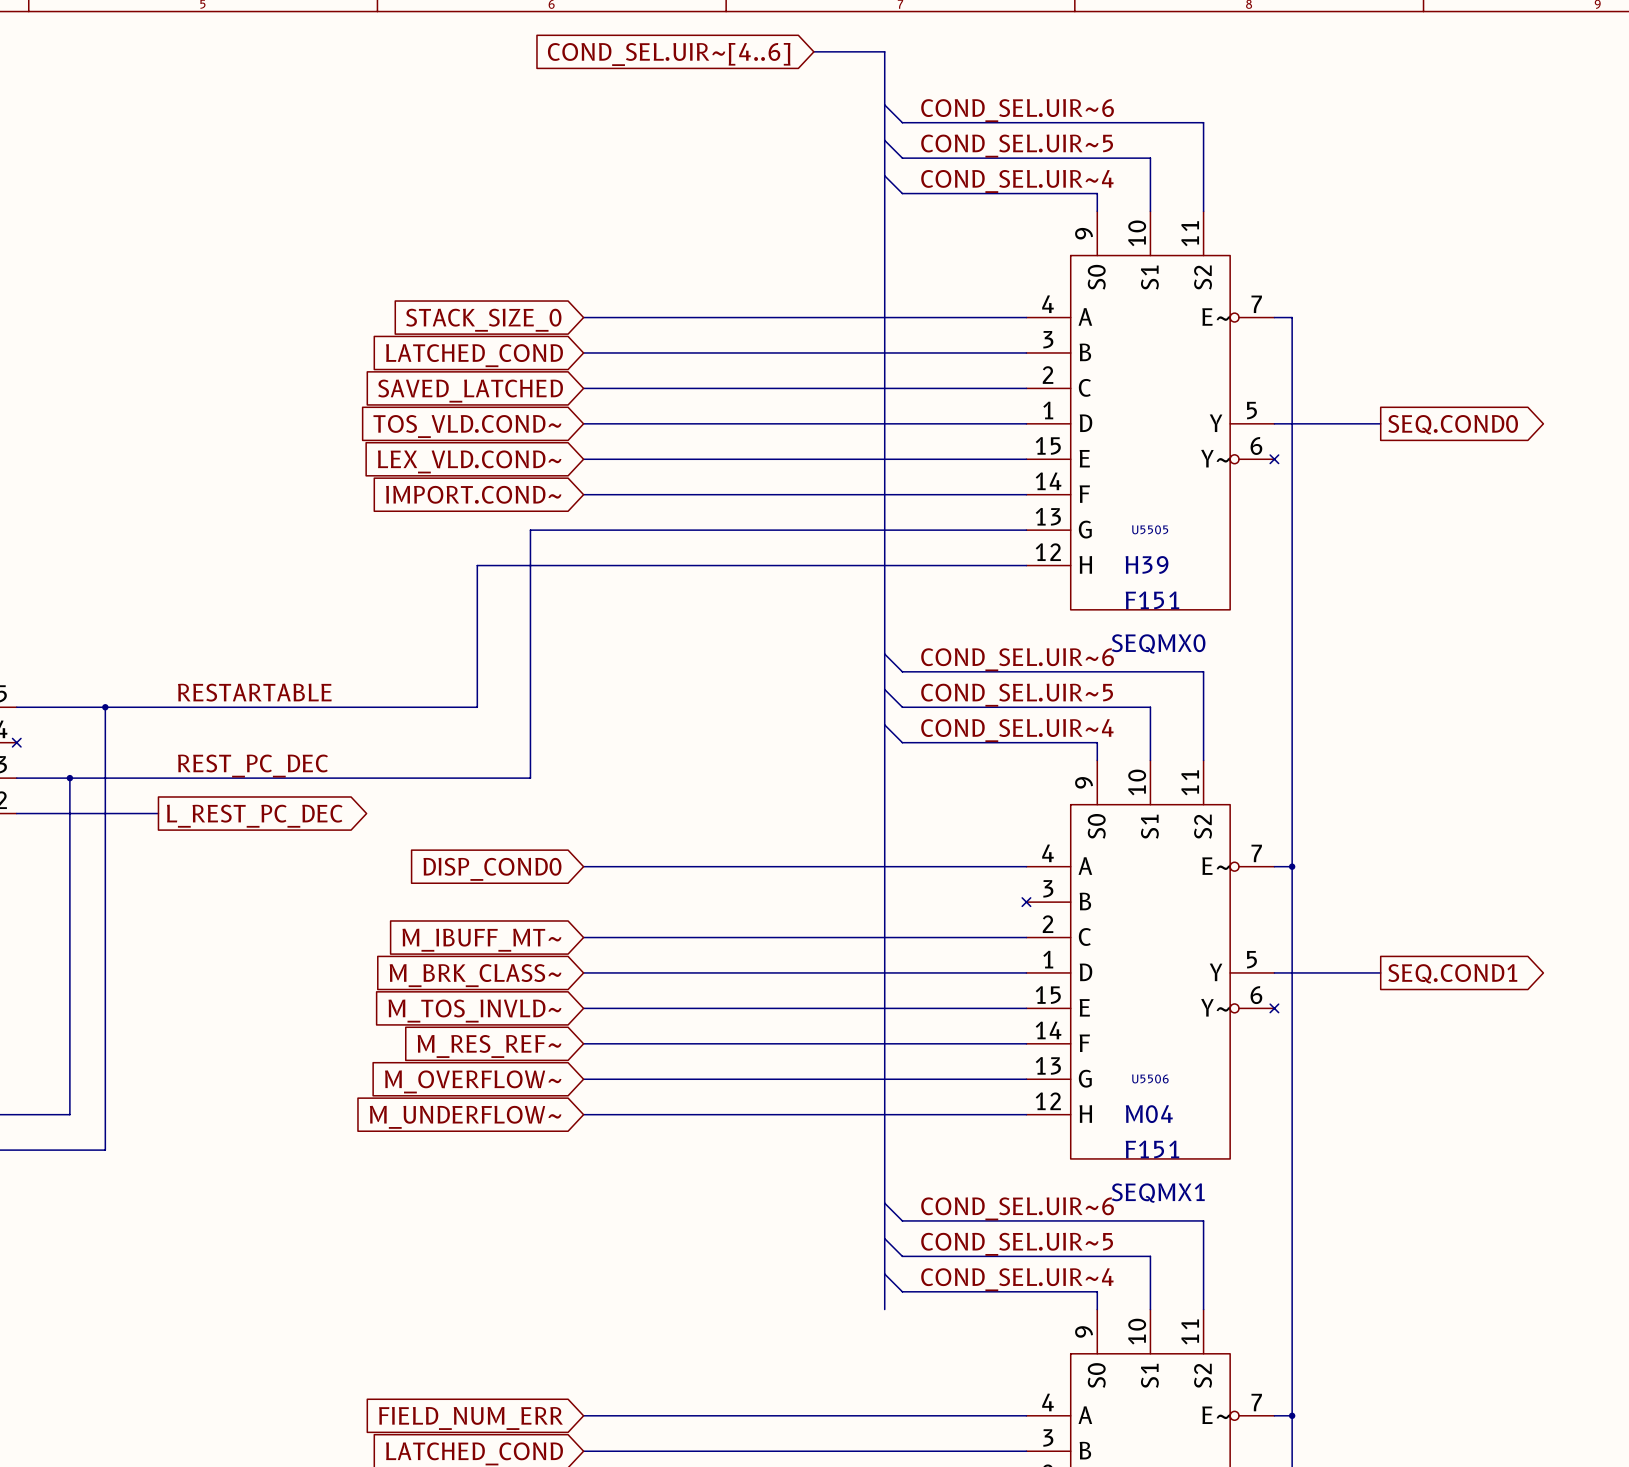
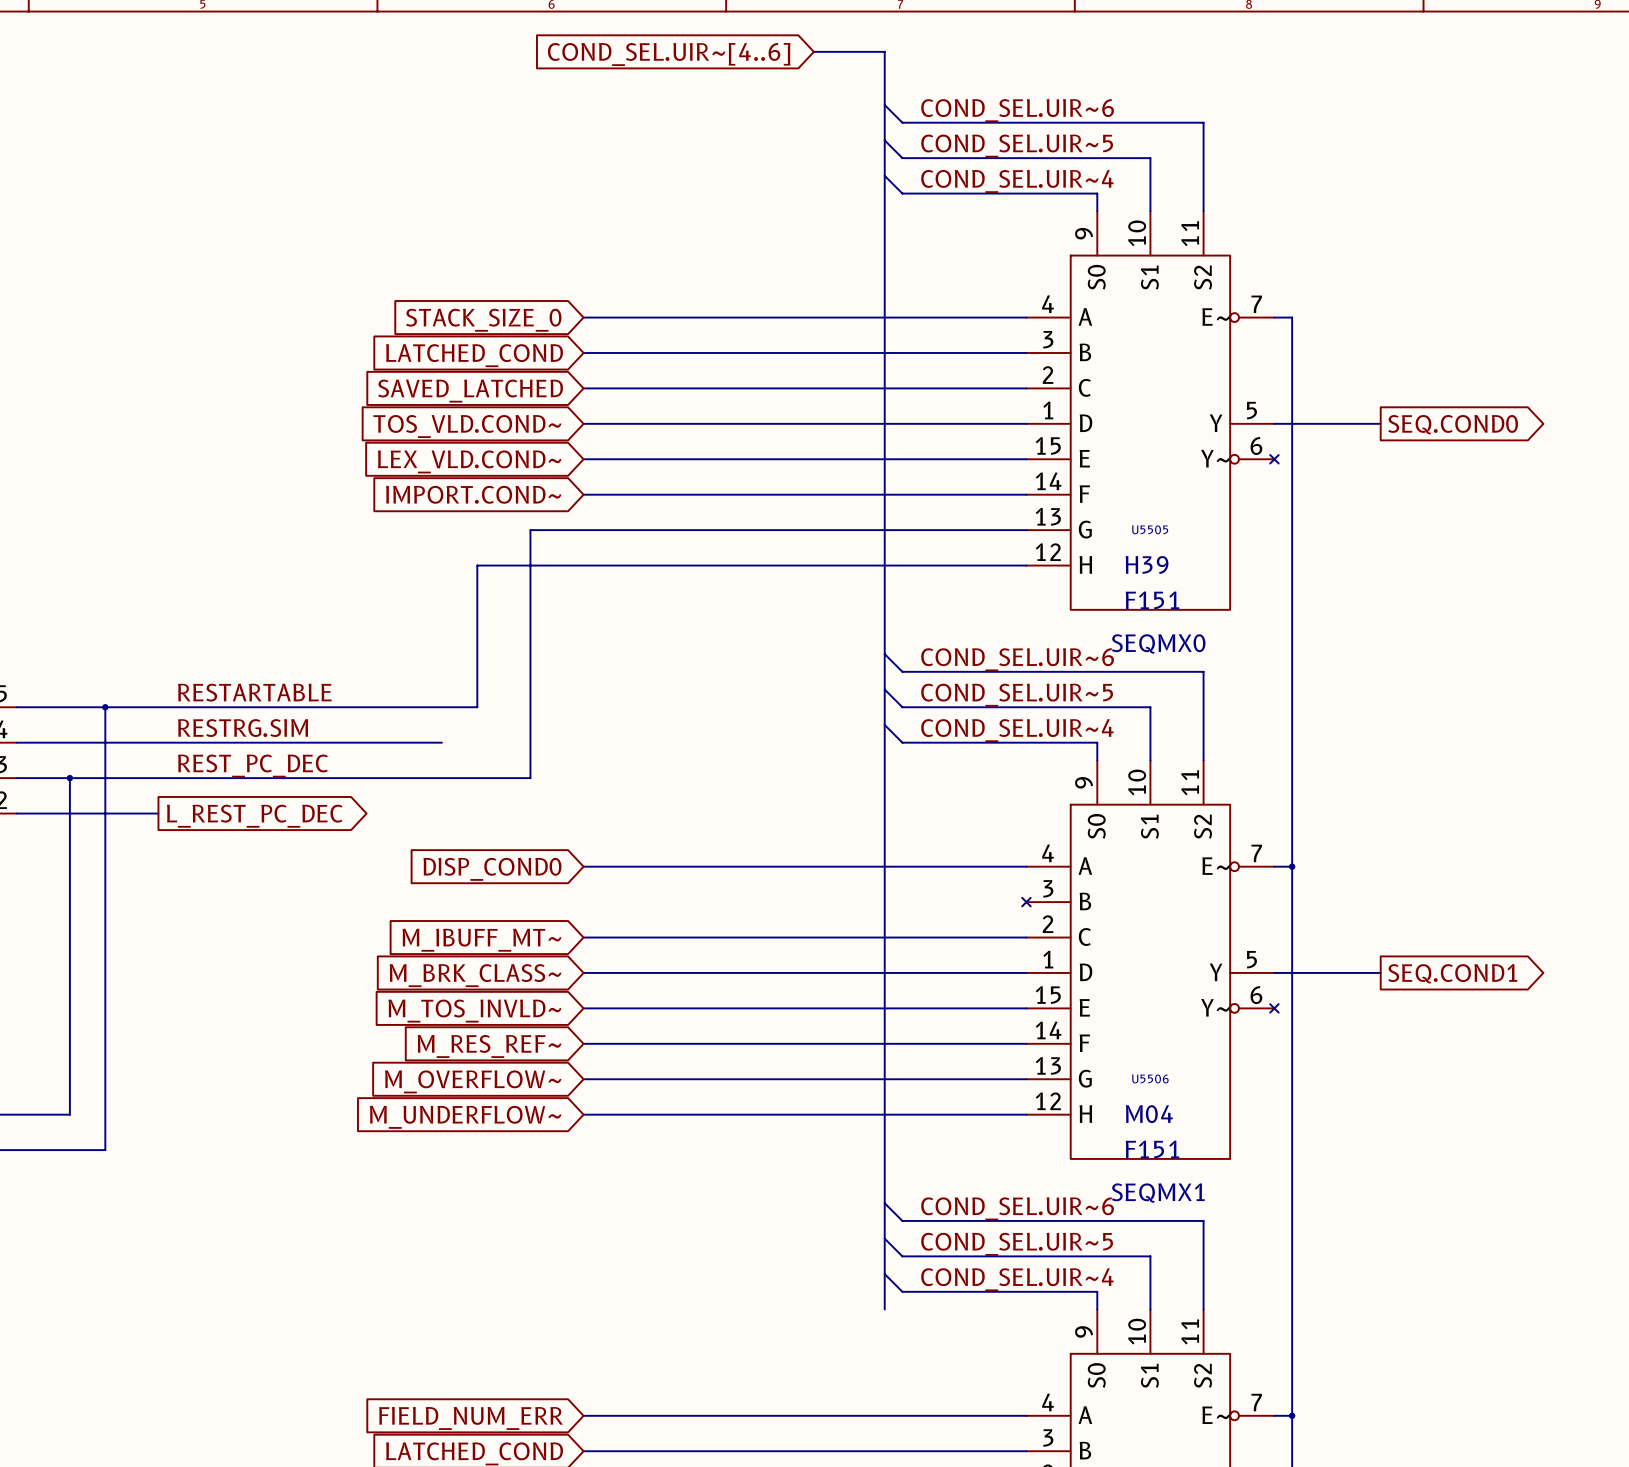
label: none -> RESTRG.SIM (242, 728)
wire: none -> (16, 742) (441, 742)
no-connect mark: (16, 742) -> none

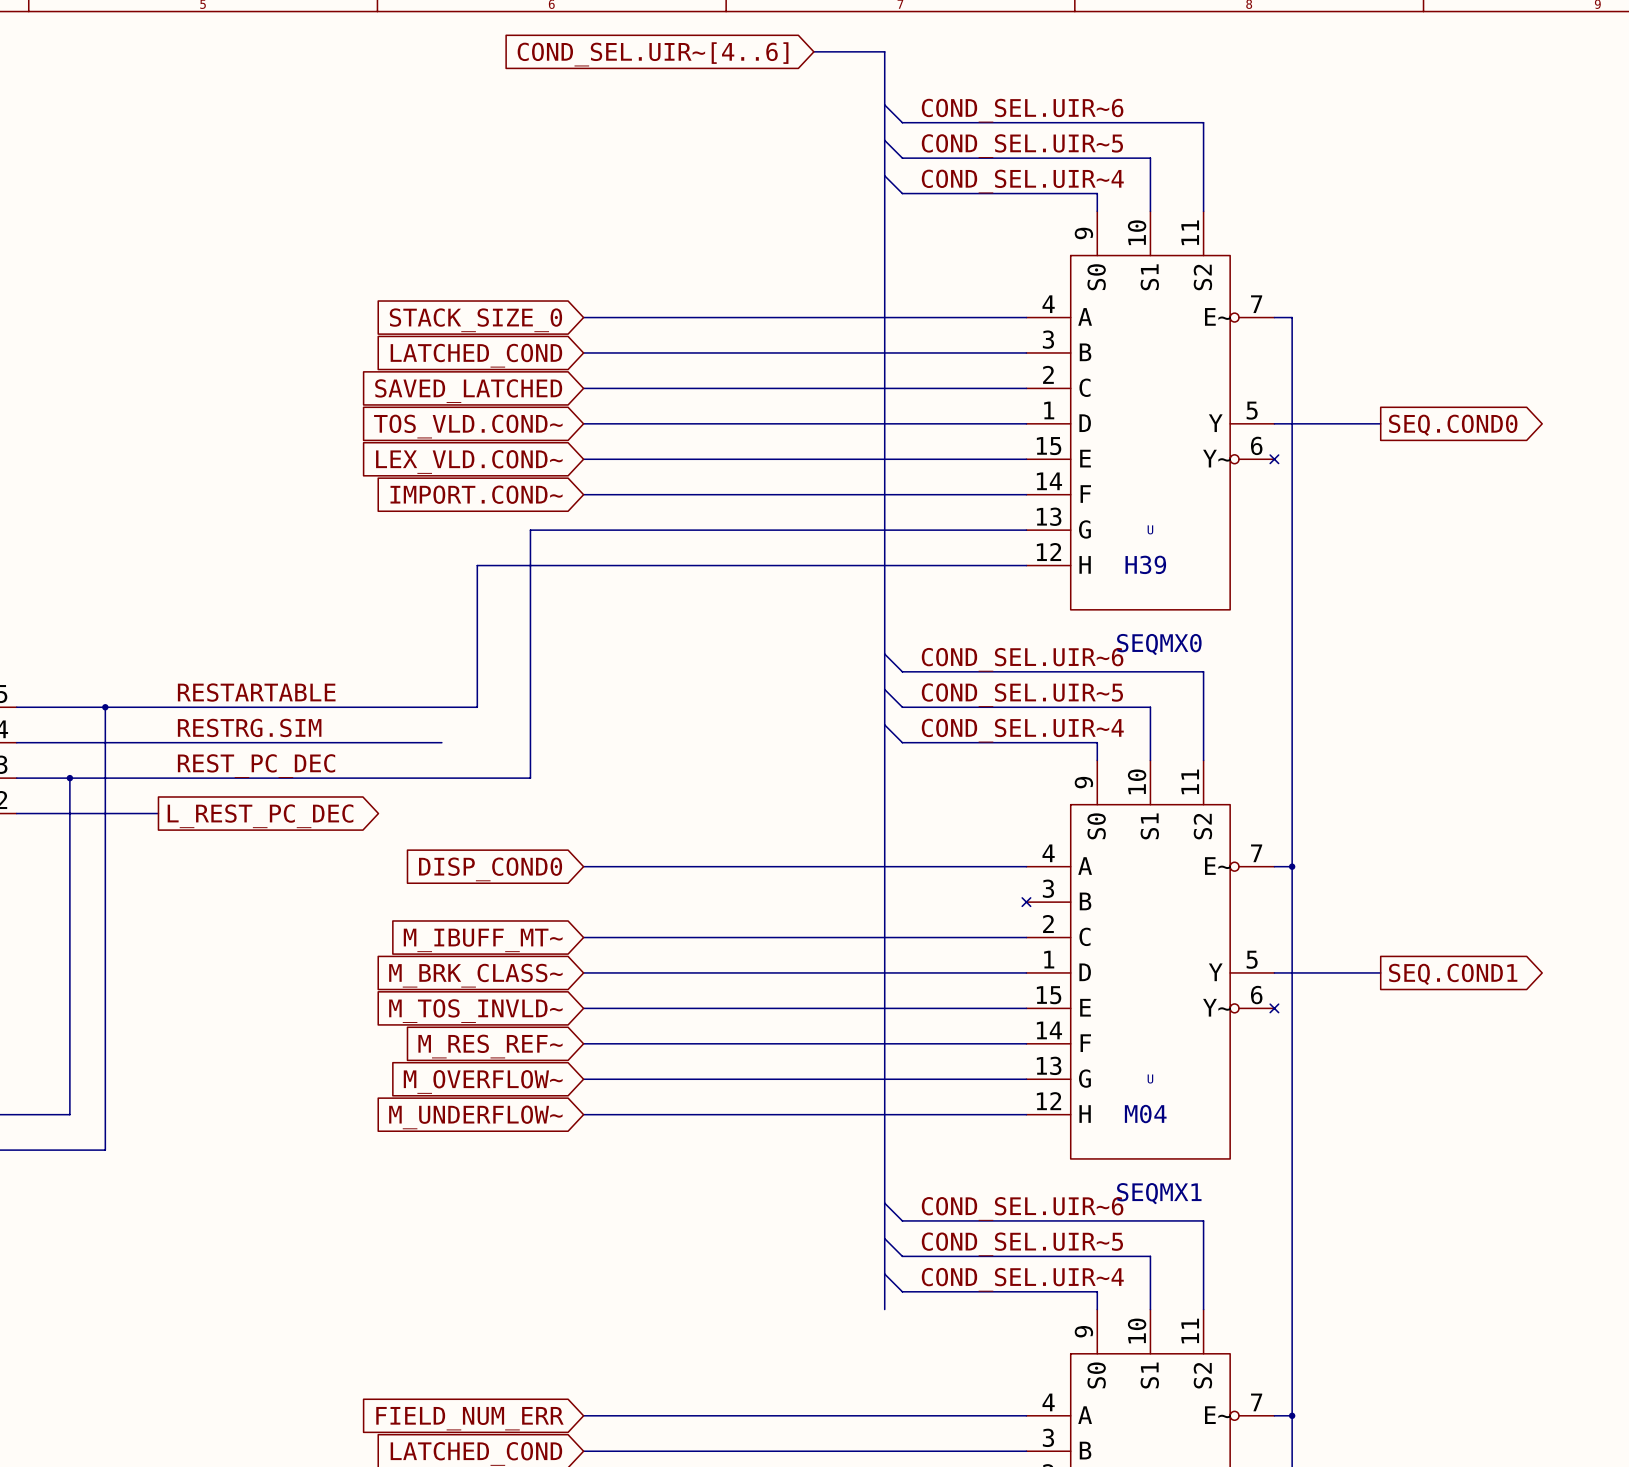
U5505 name: U5505 (1150, 529) -> U (1150, 529)
U5505 value: F151 (1152, 600) -> none
U5506 name: U5506 (1150, 1078) -> U (1150, 1079)
U5506 value: F151 (1152, 1149) -> none

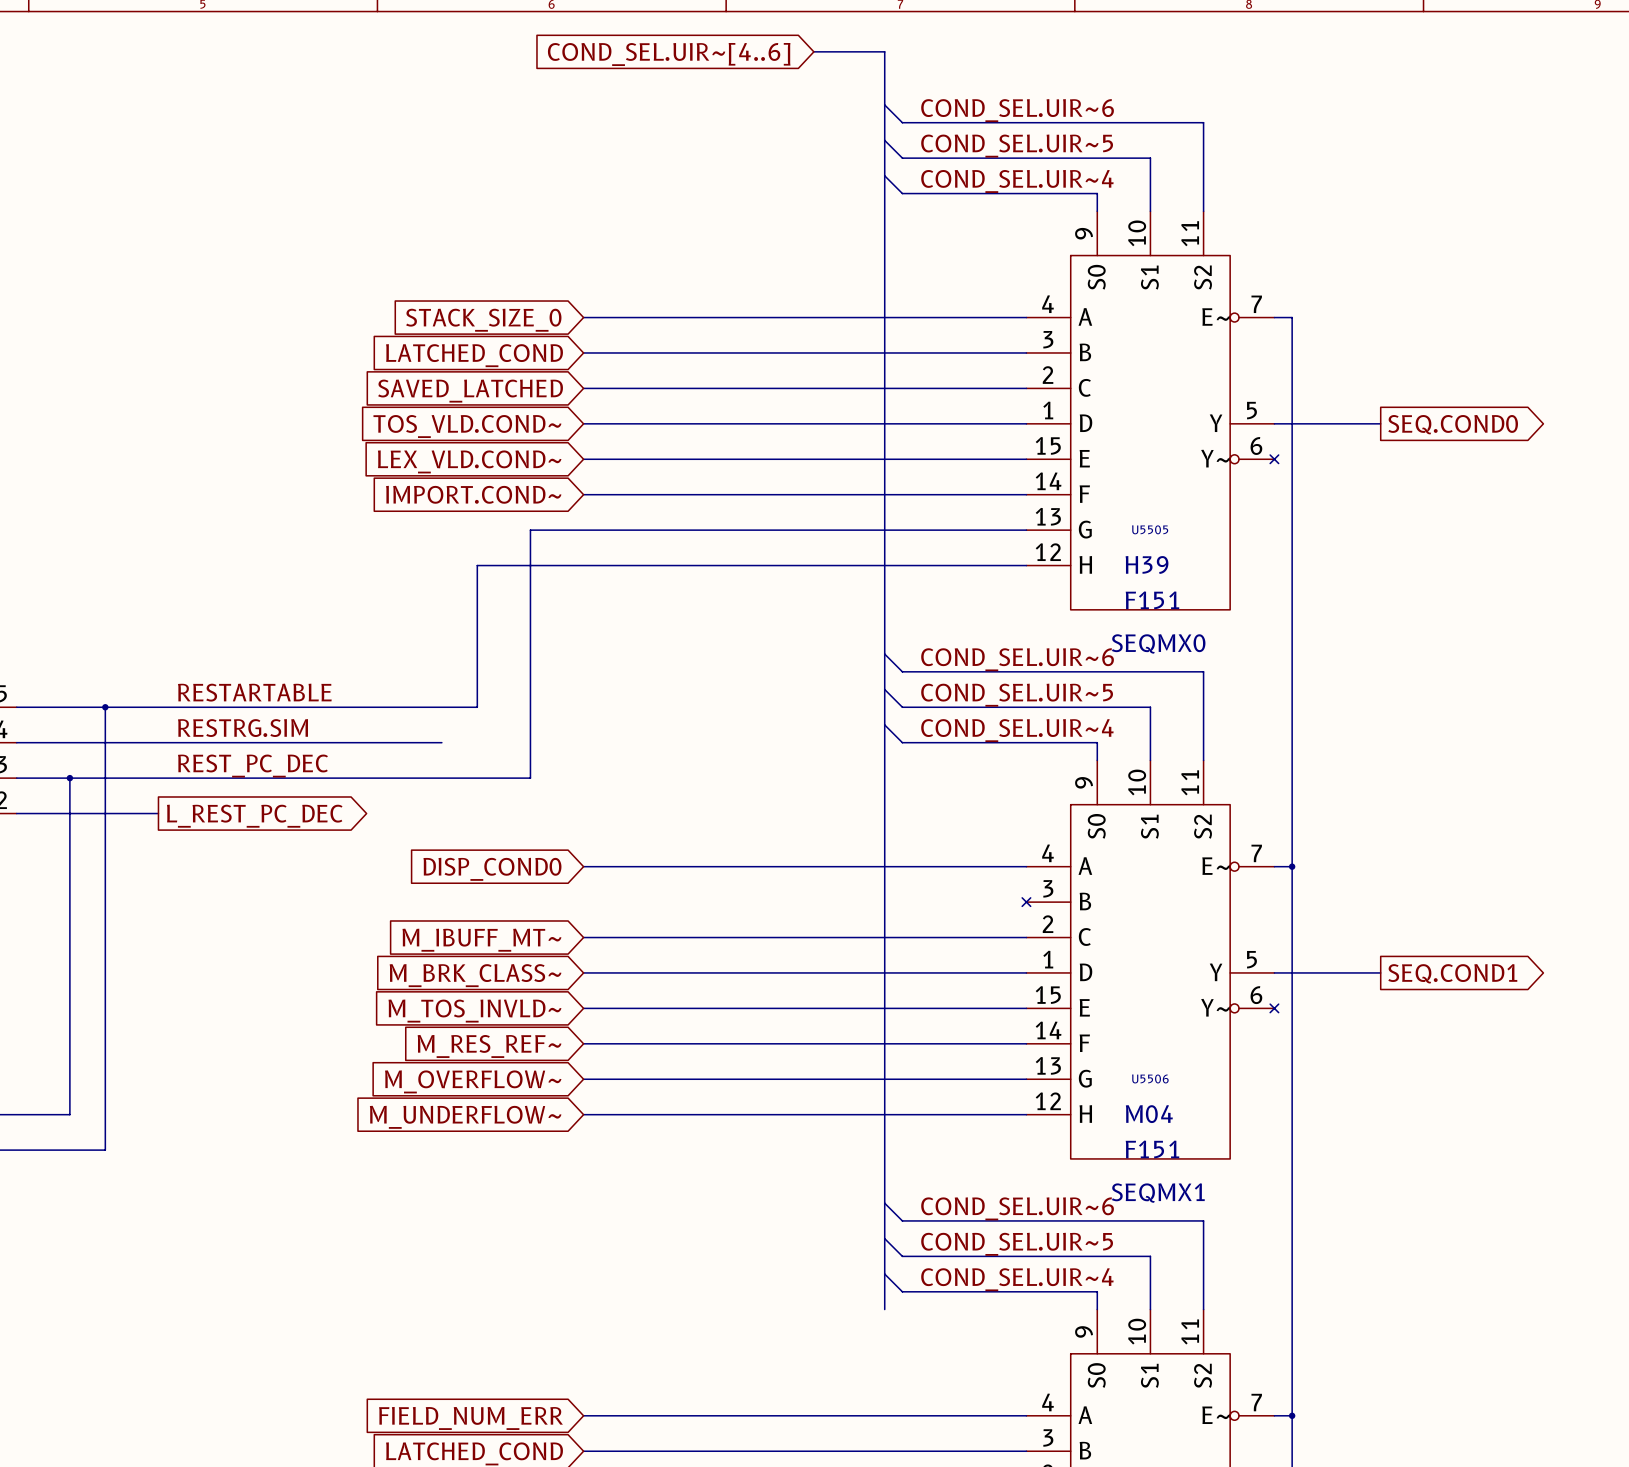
U name: U (1150, 529) -> U5505 (1150, 529)
U value: none -> F151 (1152, 600)
U name: U (1150, 1079) -> U5506 (1150, 1078)
U value: none -> F151 (1152, 1149)

